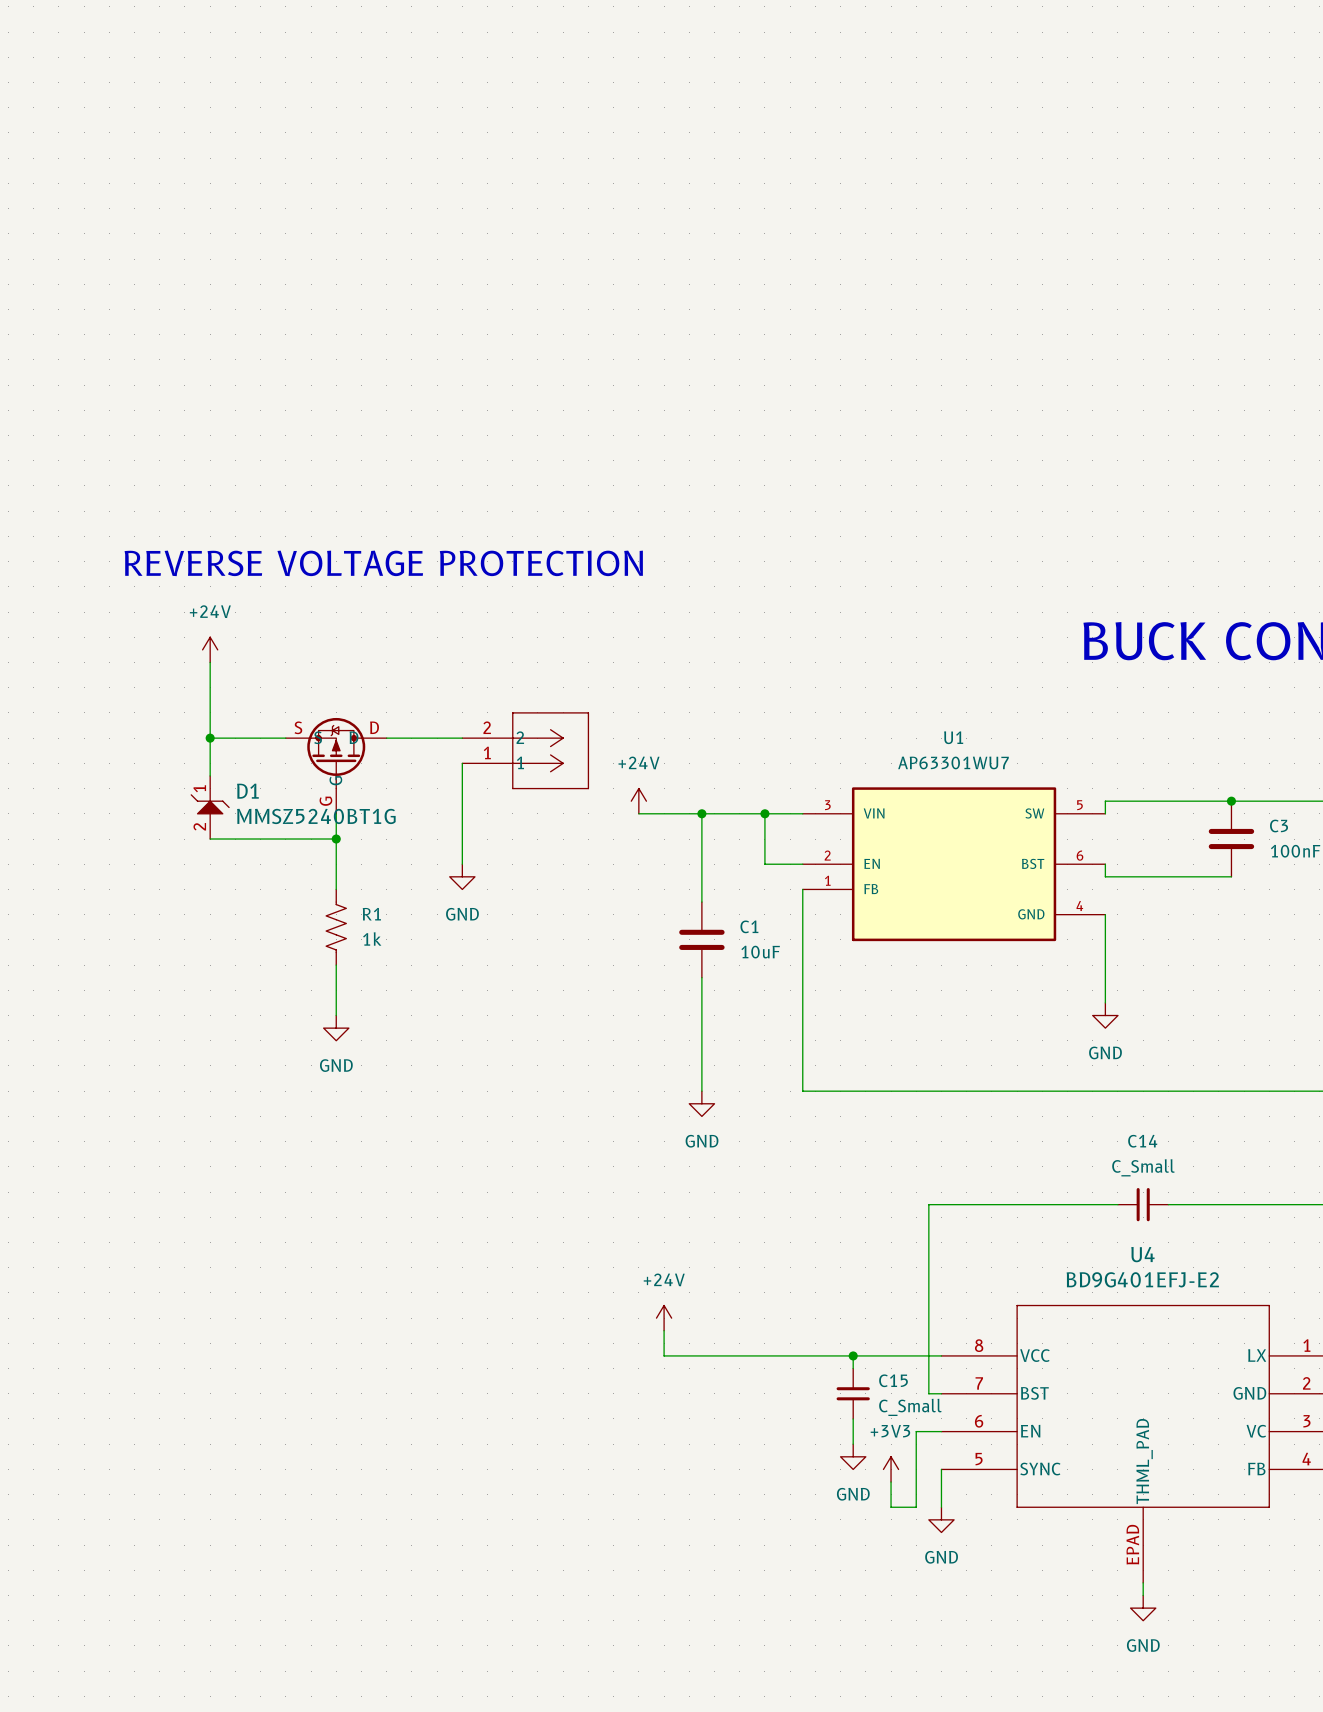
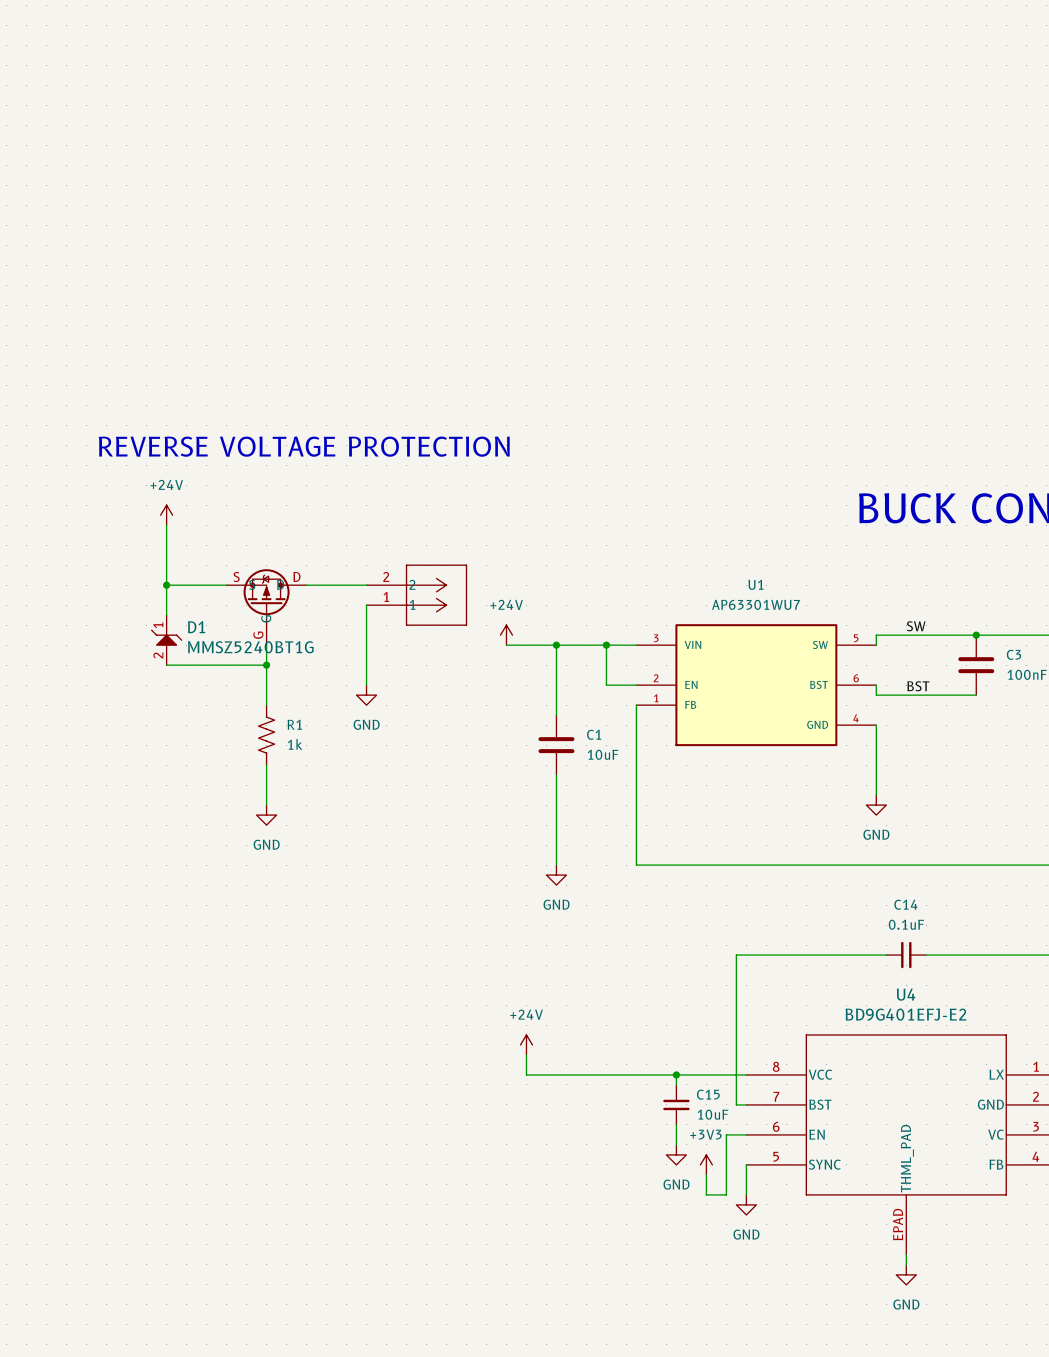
label: none -> SW (916, 626)
label: none -> BST (918, 686)
C14 value: C_Small (1143, 1167) -> 0.1uF (906, 924)
C15 value: C_Small (910, 1407) -> 10uF (712, 1114)

